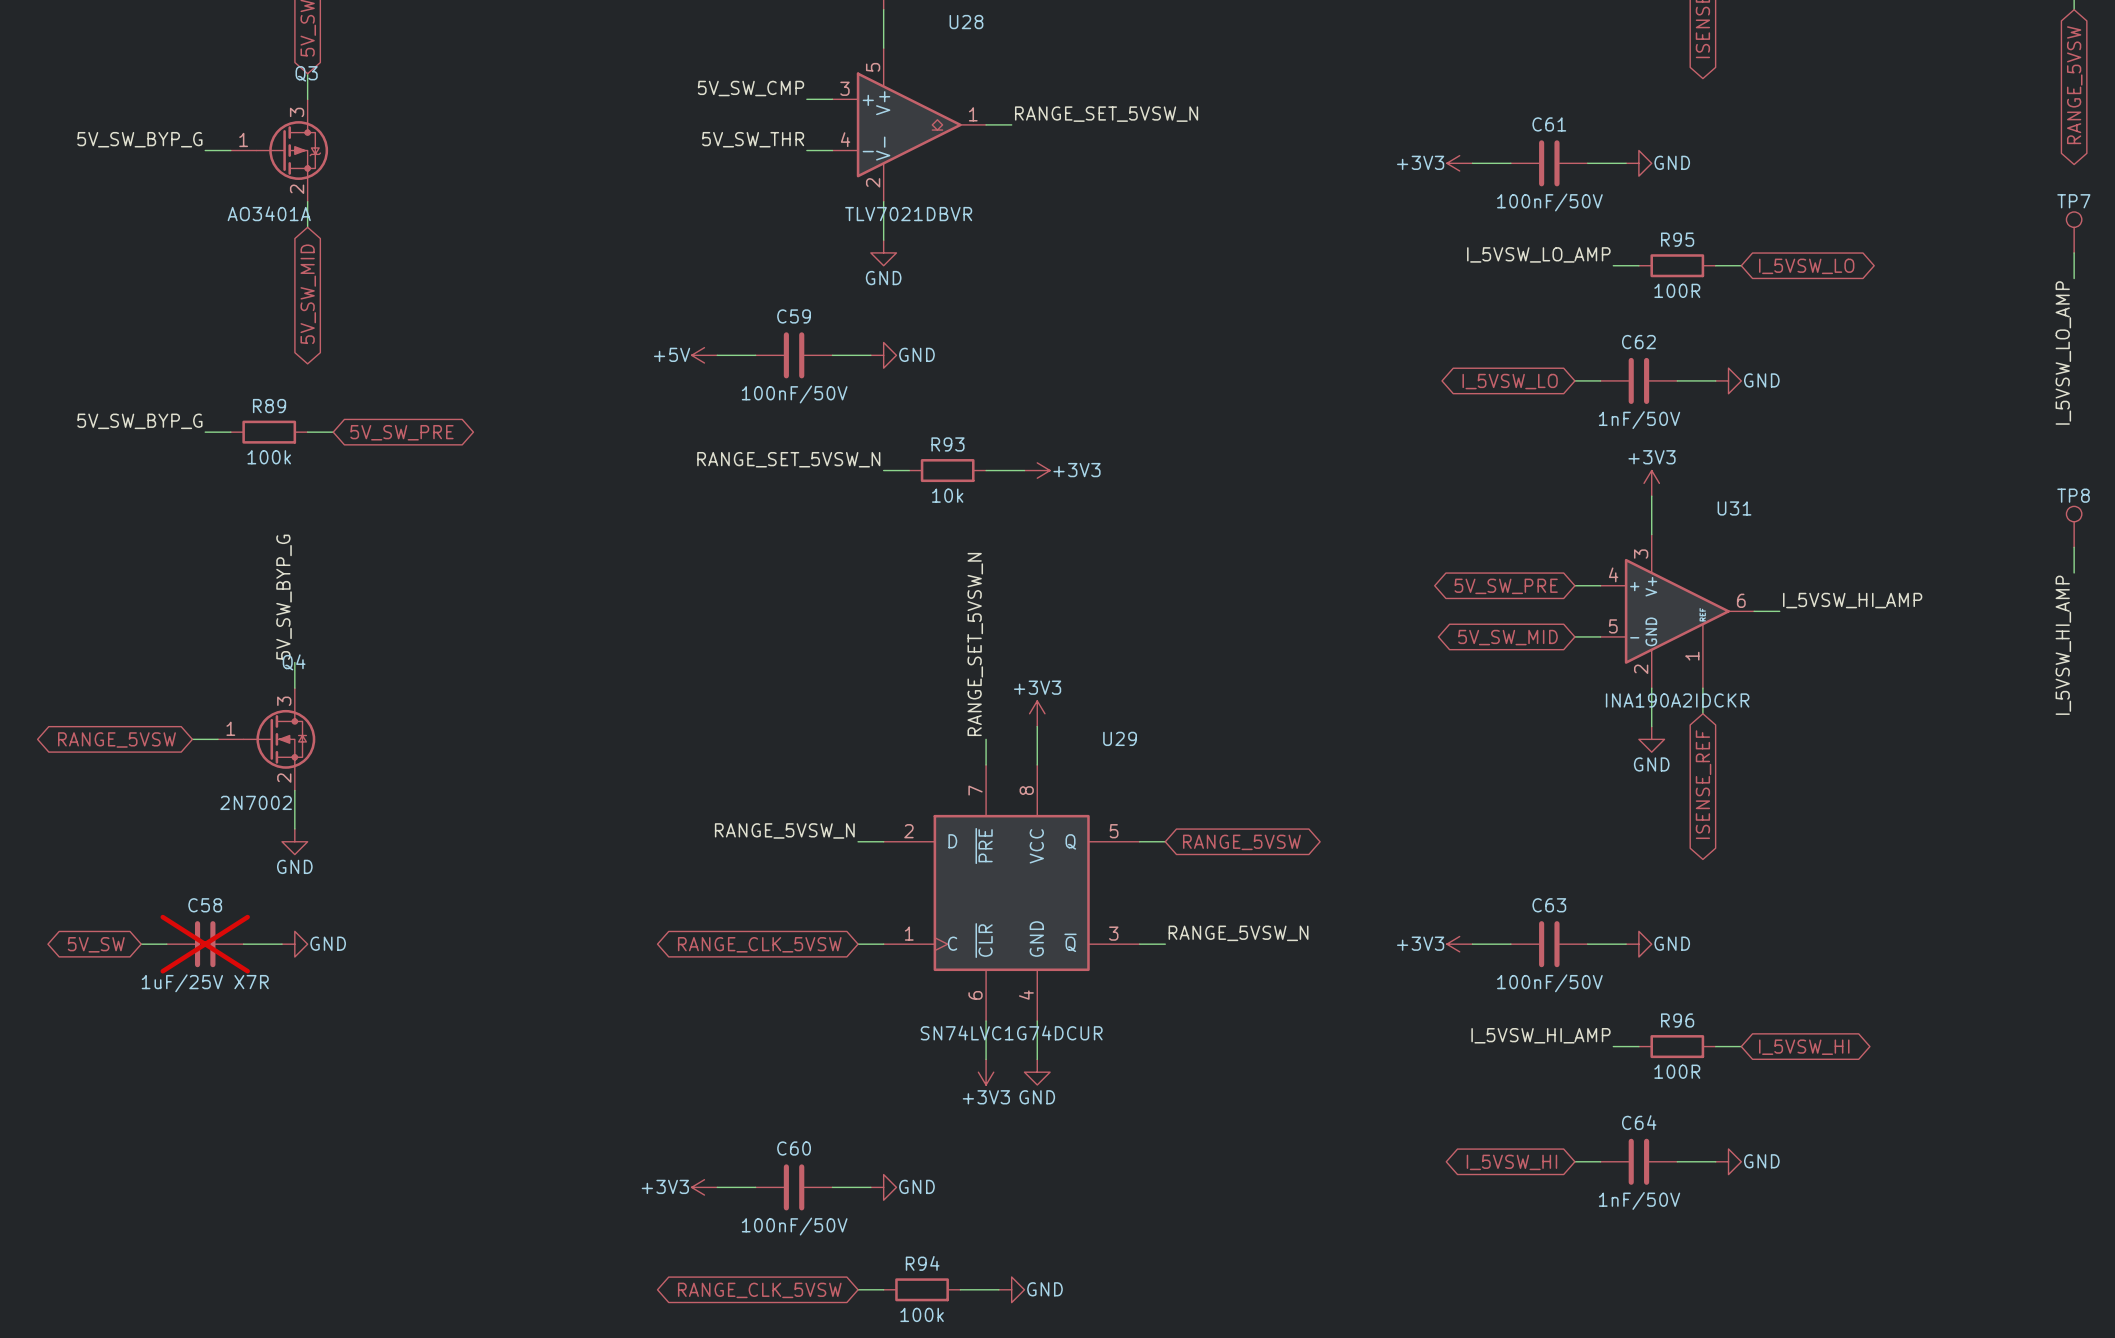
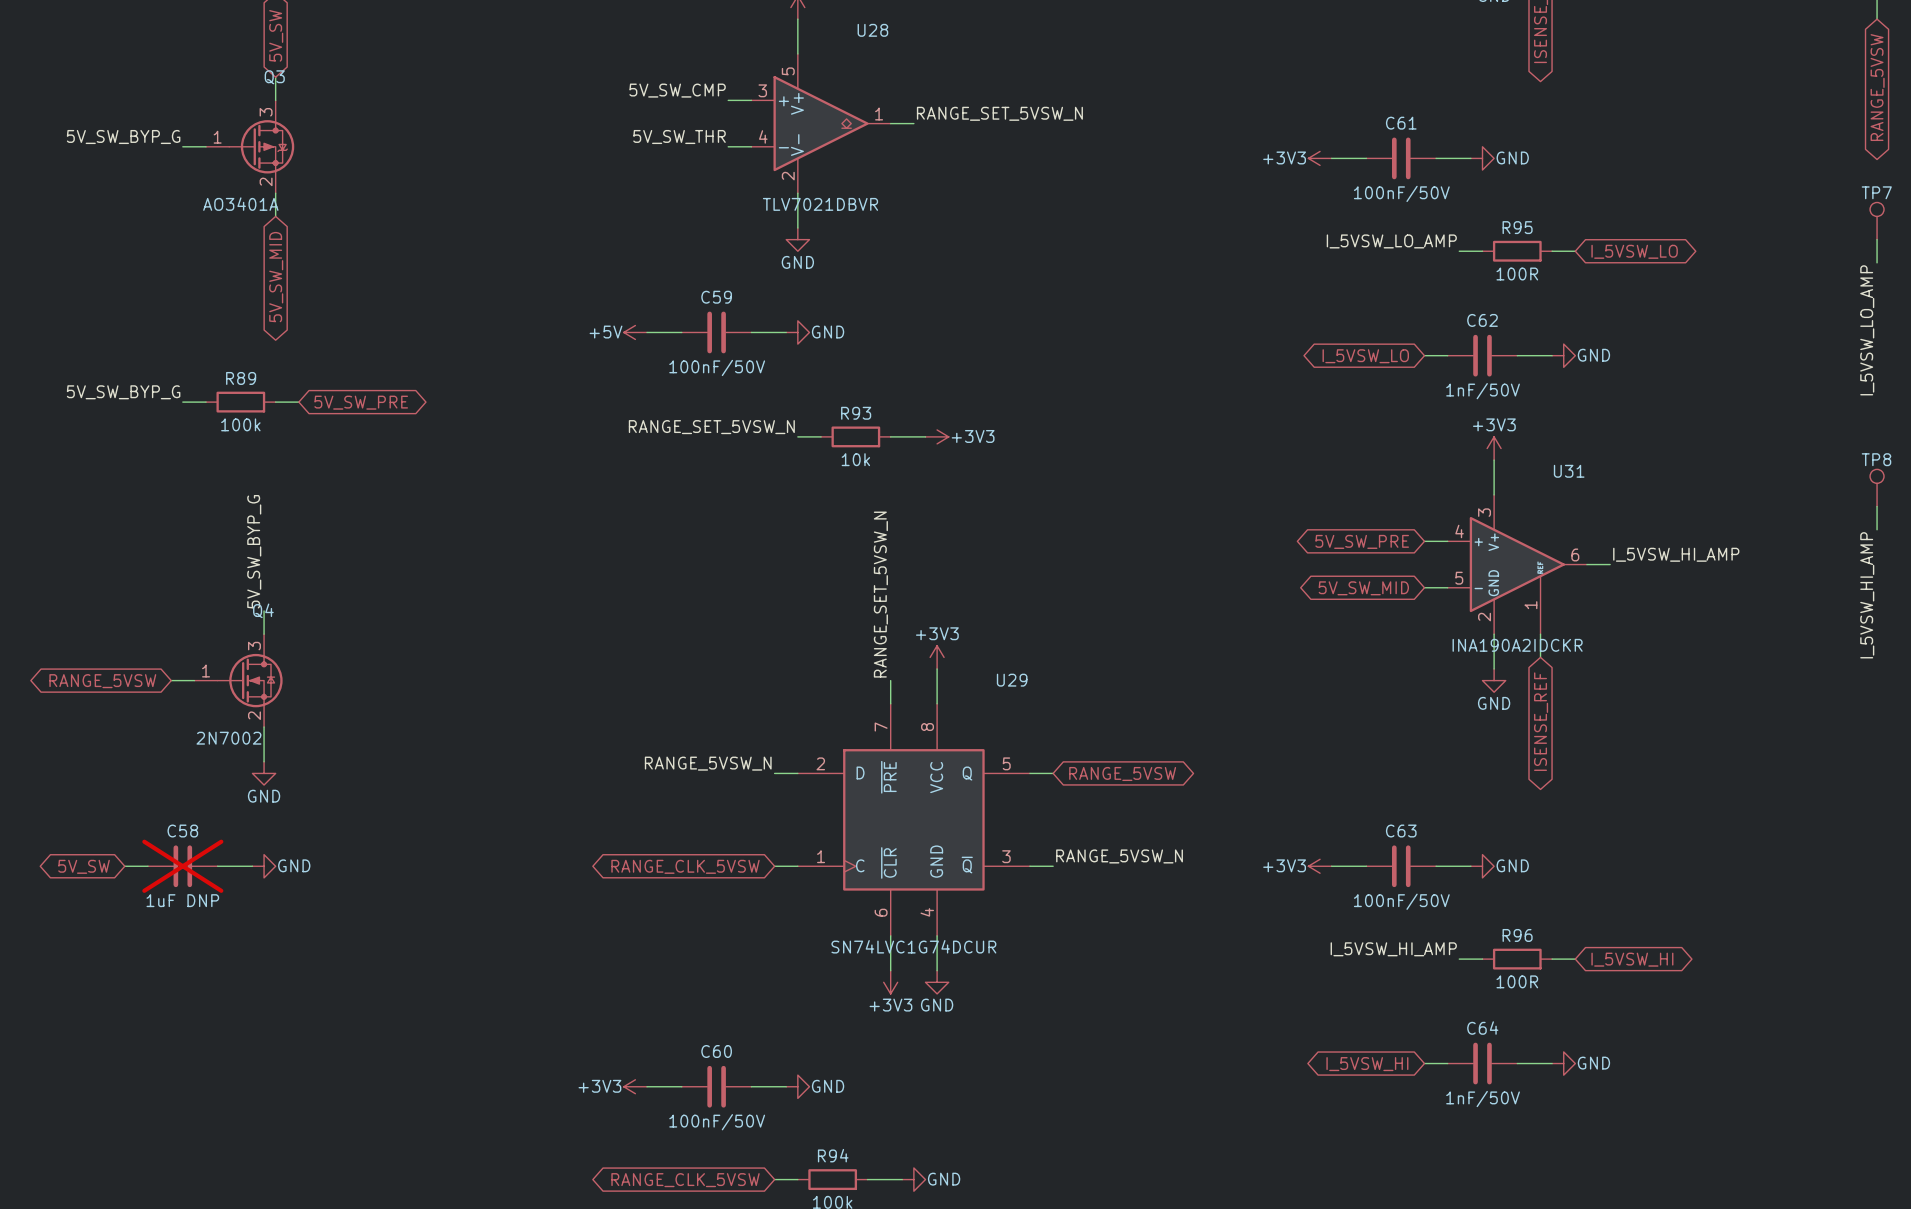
C58 value: 1uF/25V X7R (205, 983) -> 1uF DNP (182, 900)

